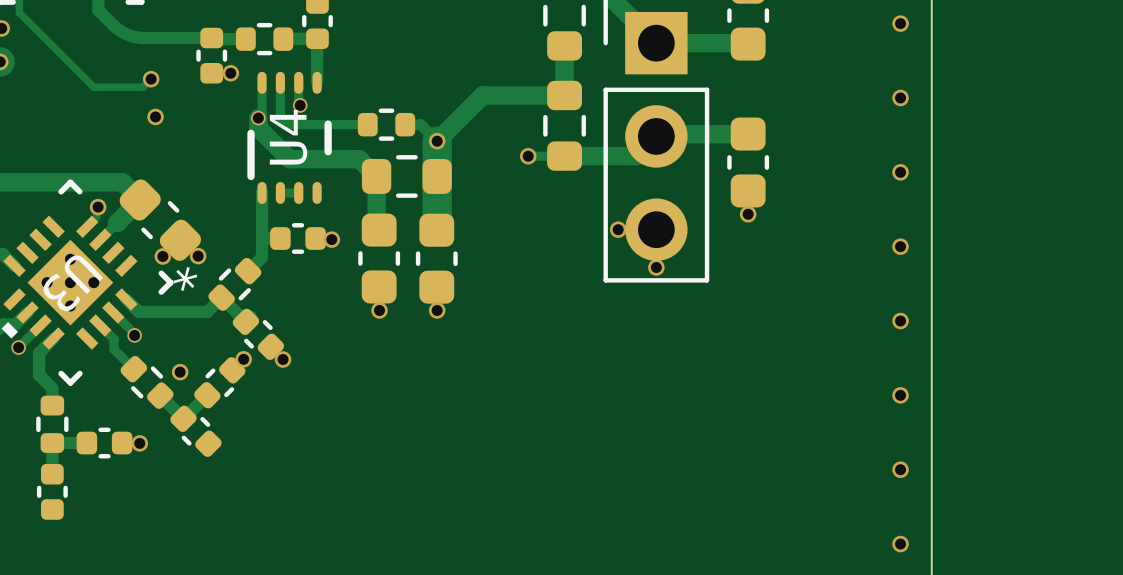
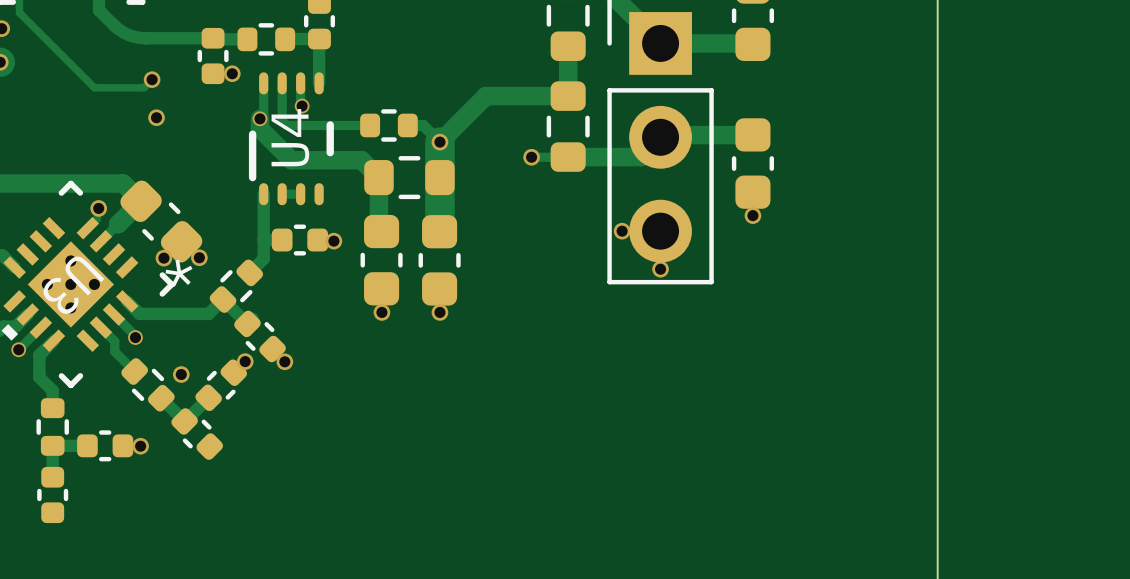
via: (900, 23) -> none
via: (900, 97) -> none
via: (900, 172) -> none
via: (900, 246) -> none
via: (900, 321) -> none
via: (900, 395) -> none
via: (900, 469) -> none
via: (900, 544) -> none

